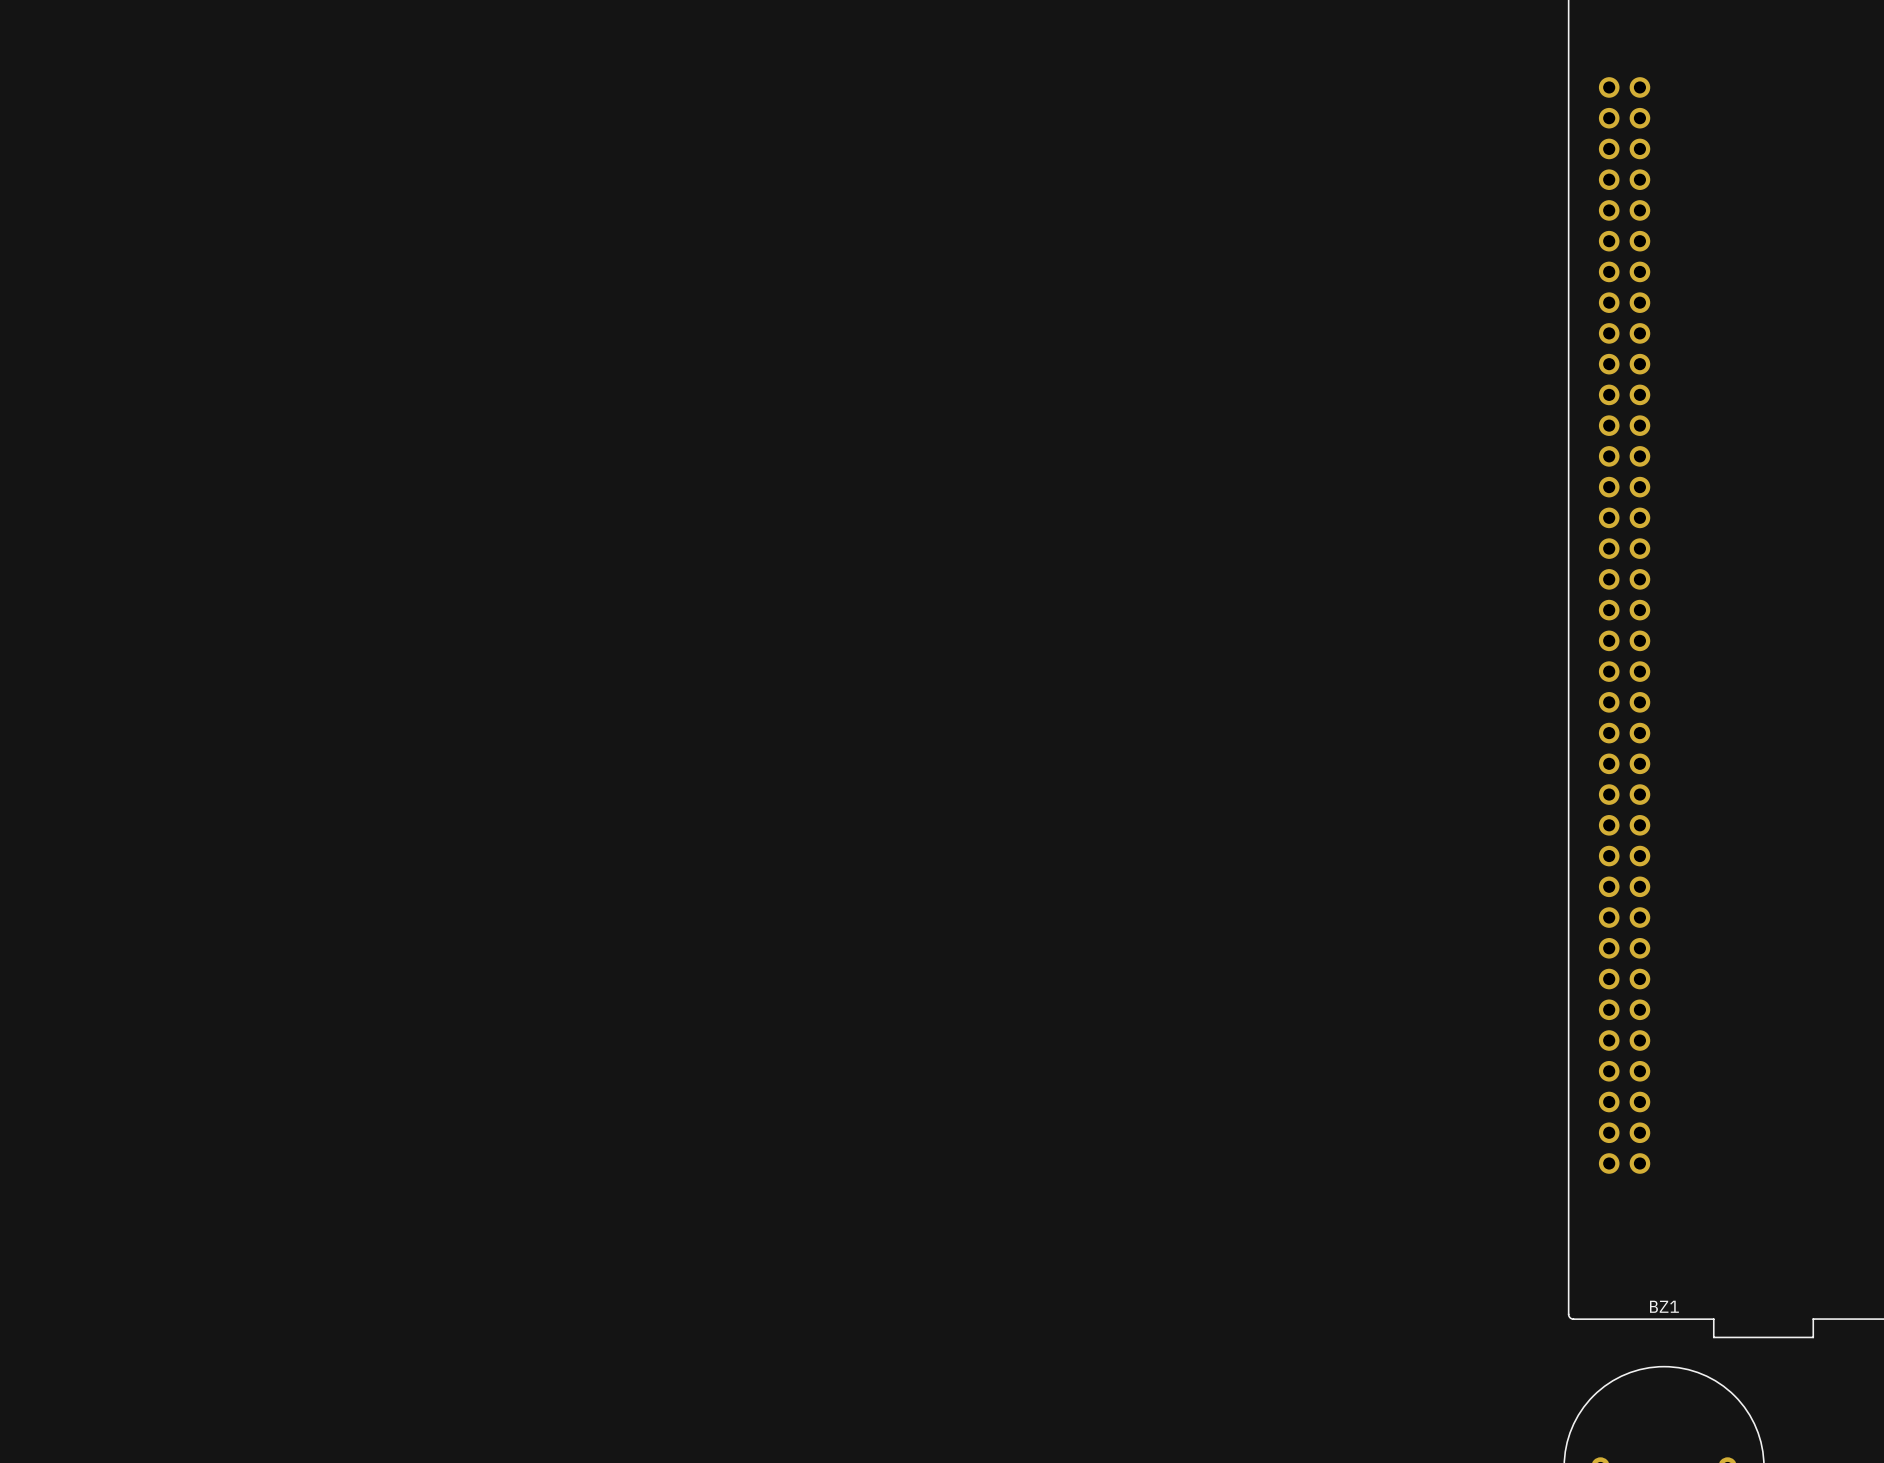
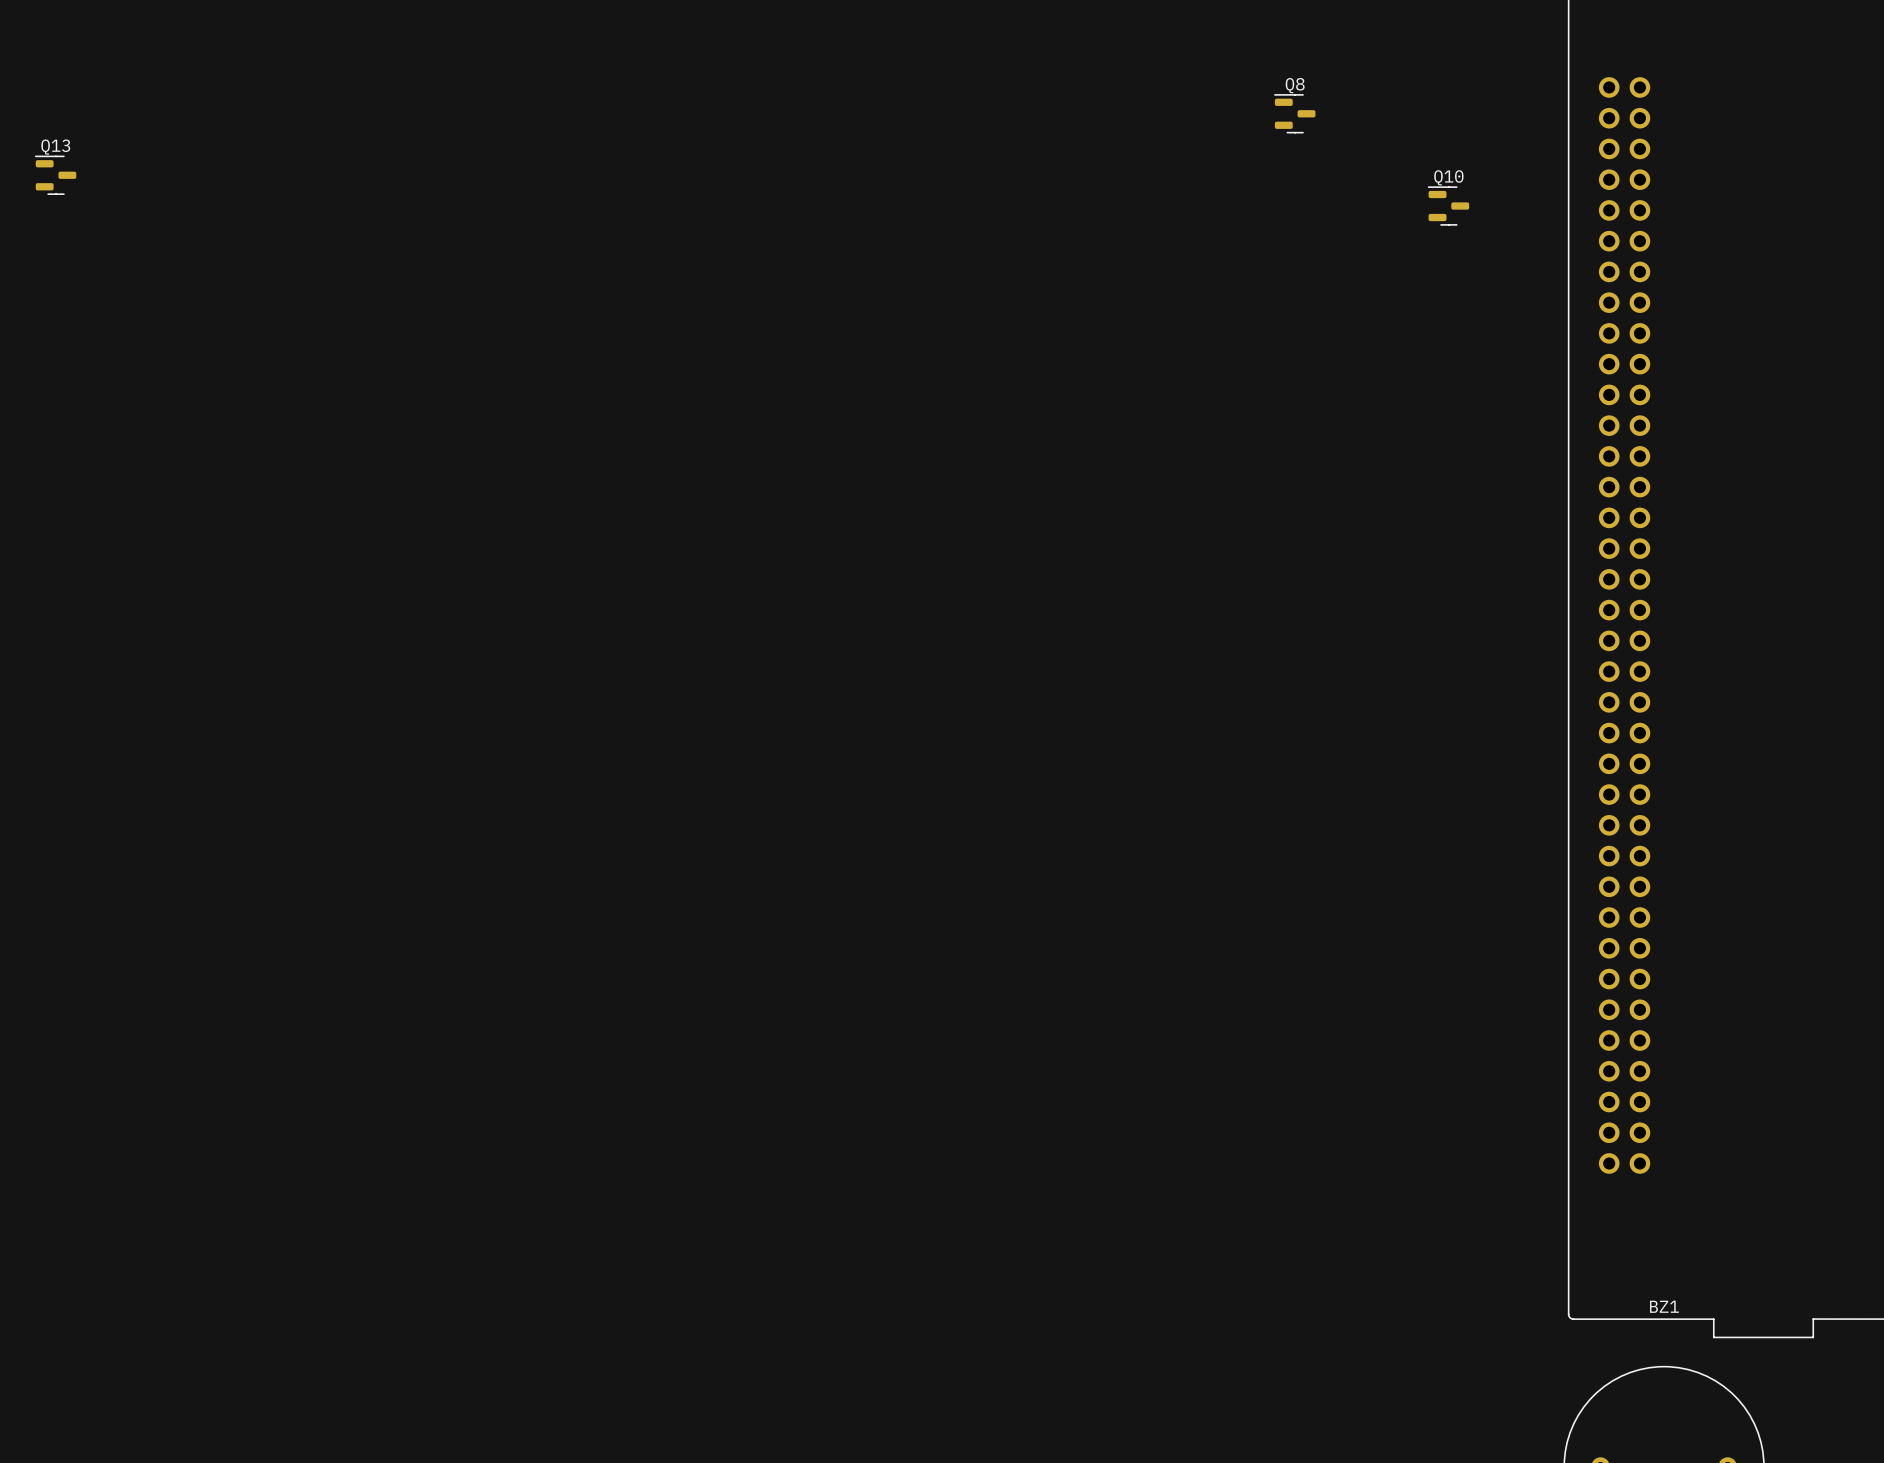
Q8: none -> (1294, 113)
Q13: none -> (55, 175)
Q10: none -> (1448, 206)

